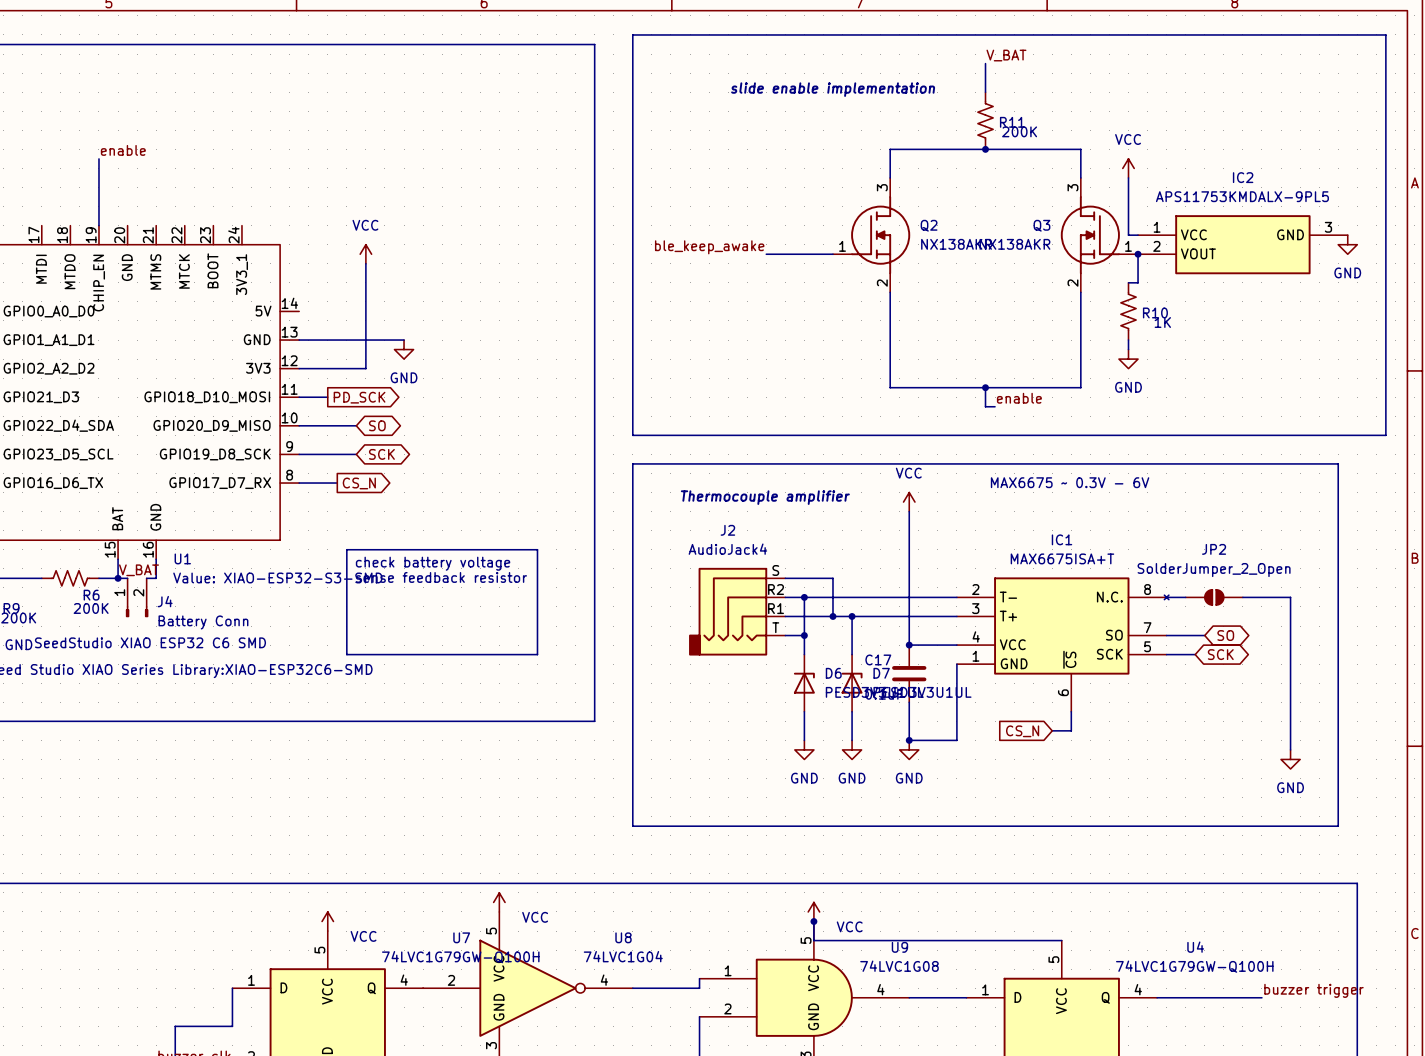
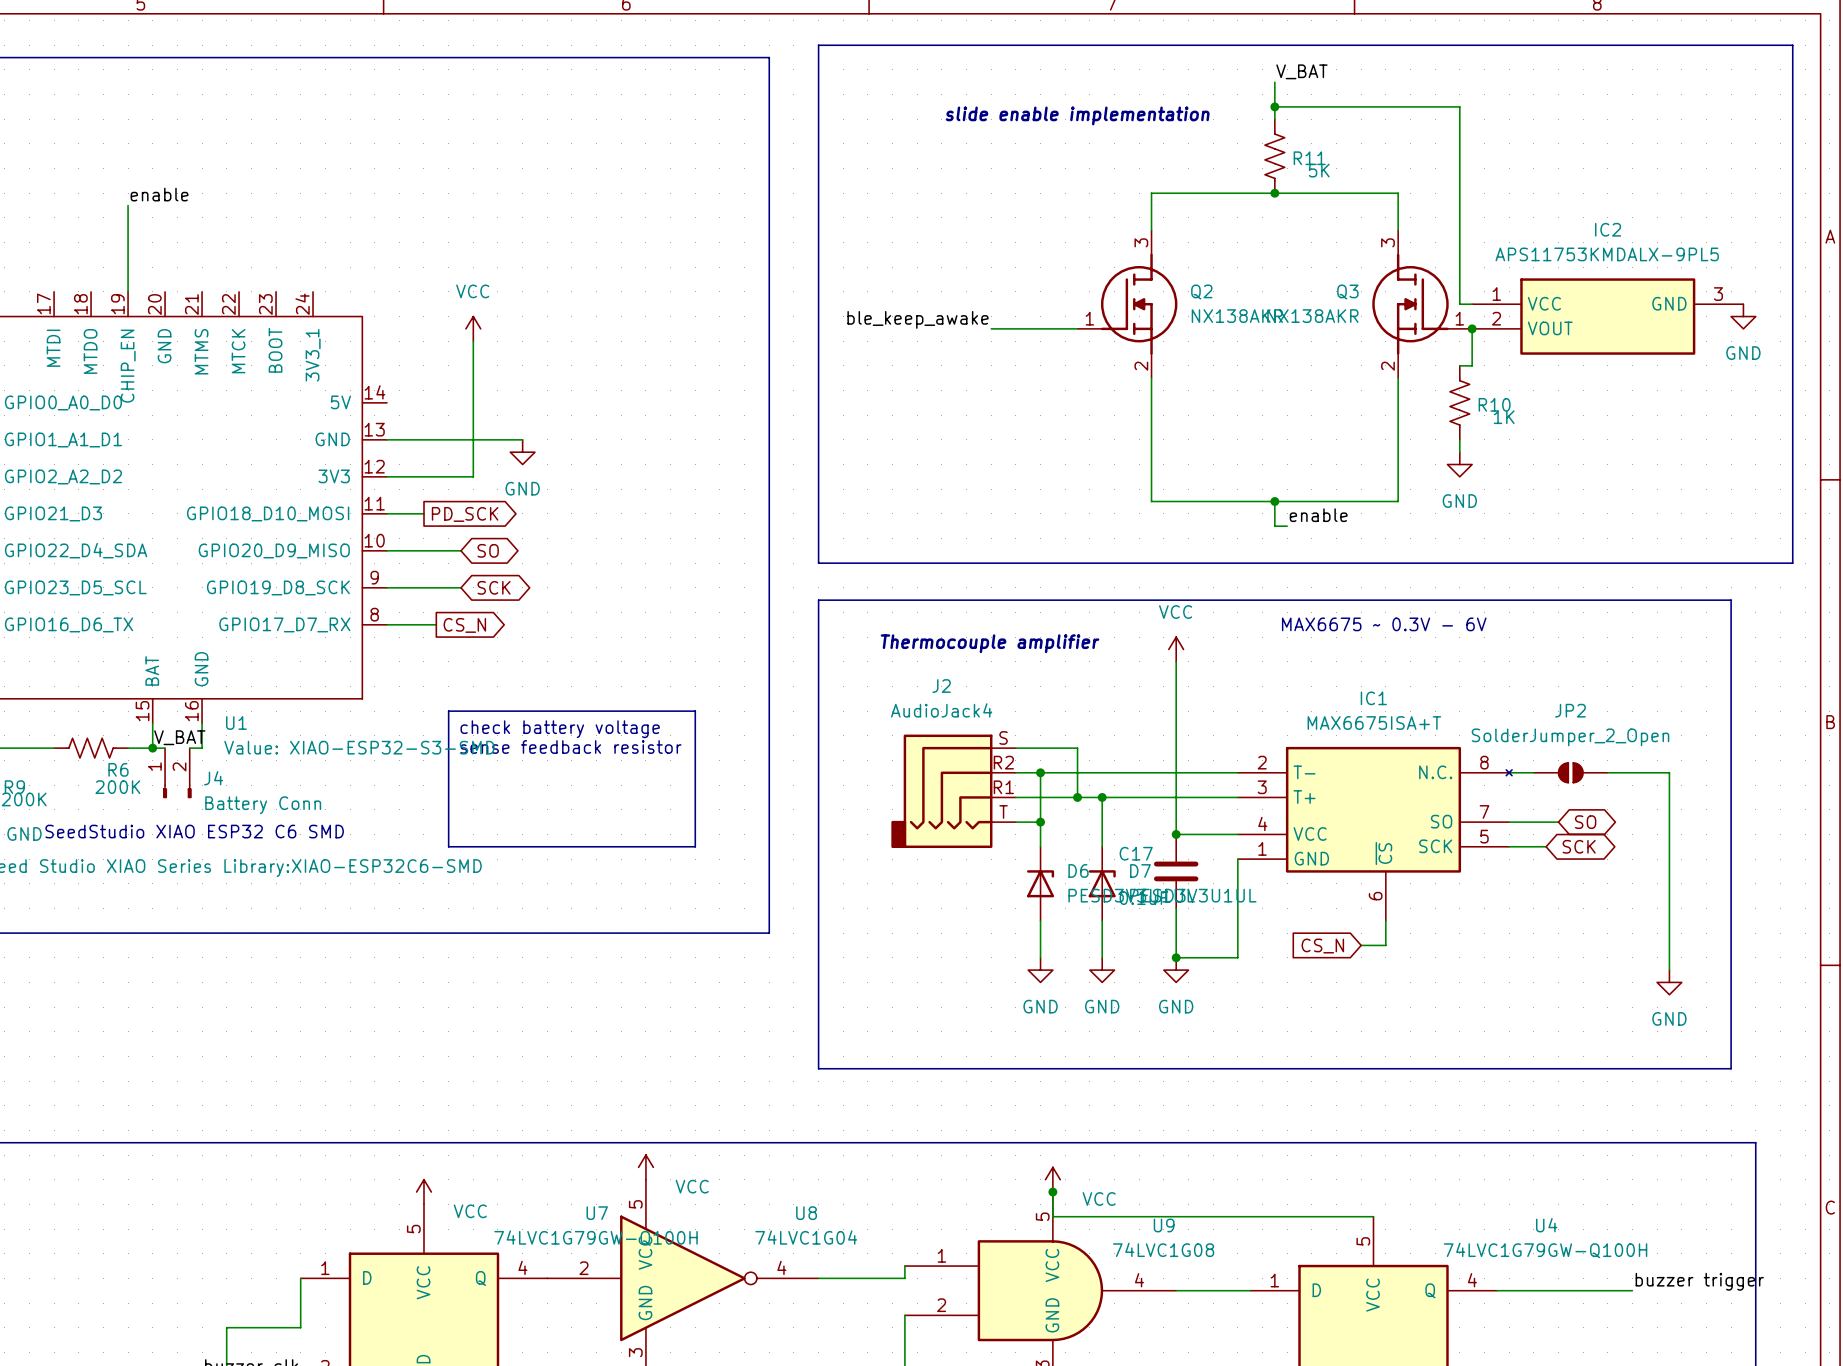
wire: none -> (1274, 106) (1459, 106) (1459, 230)
junction: none -> (1274, 106)
R11 value: 200K (1019, 131) -> 5K (1319, 170)
power symbol: VCC (1128, 168) -> none

